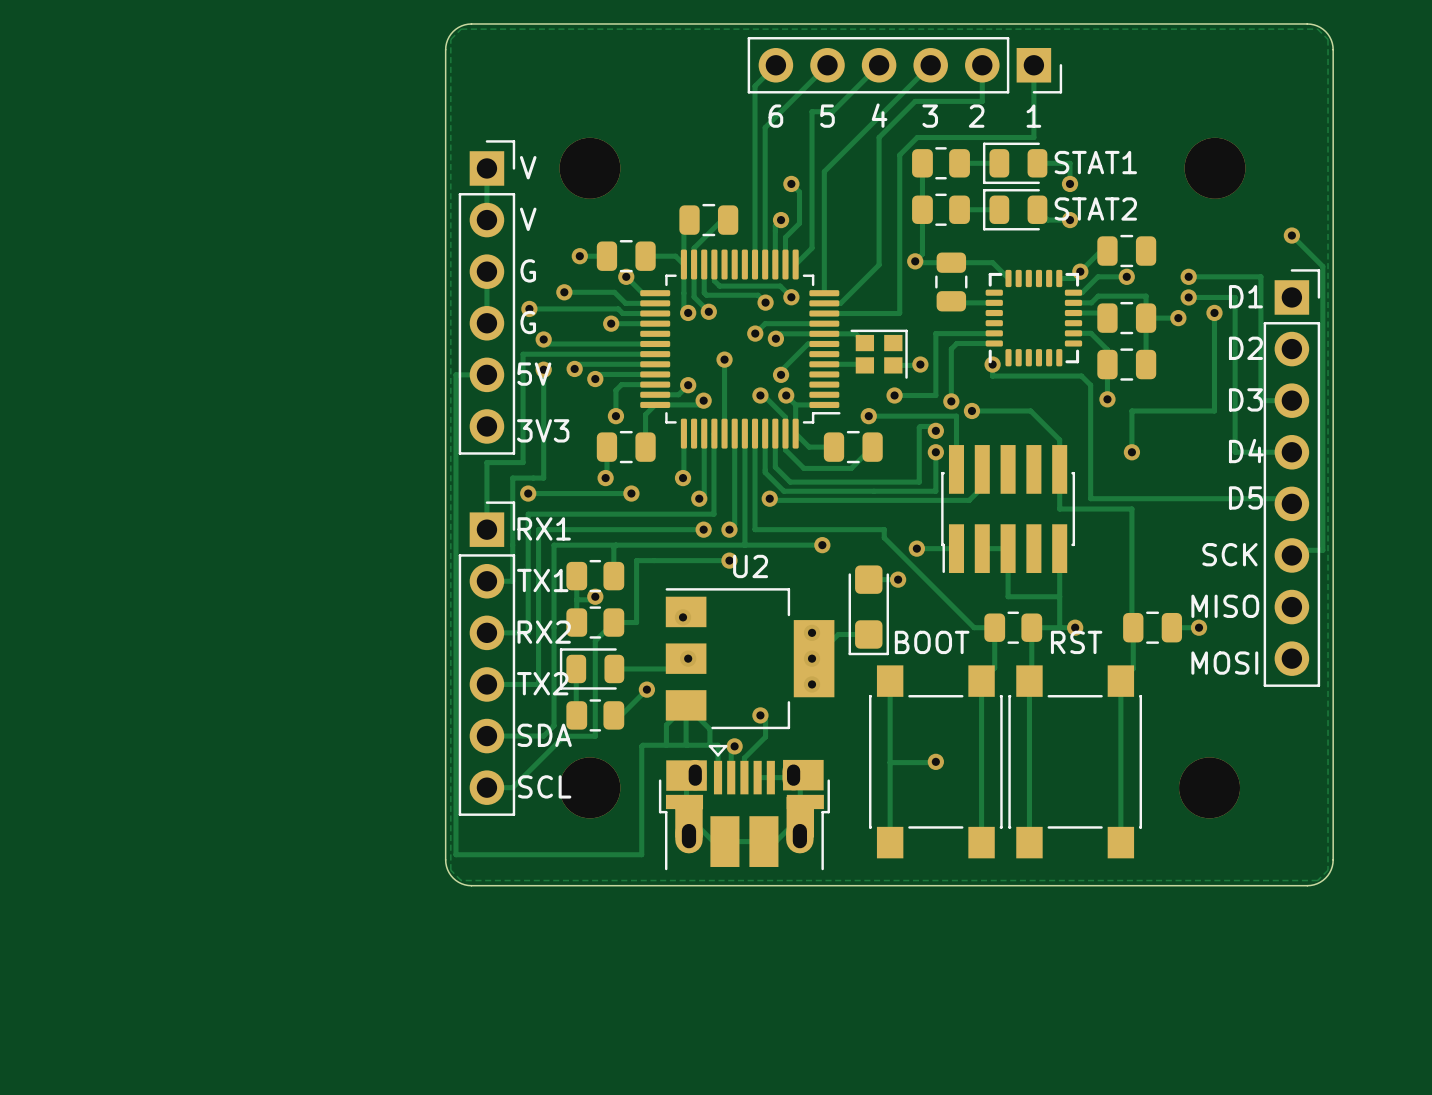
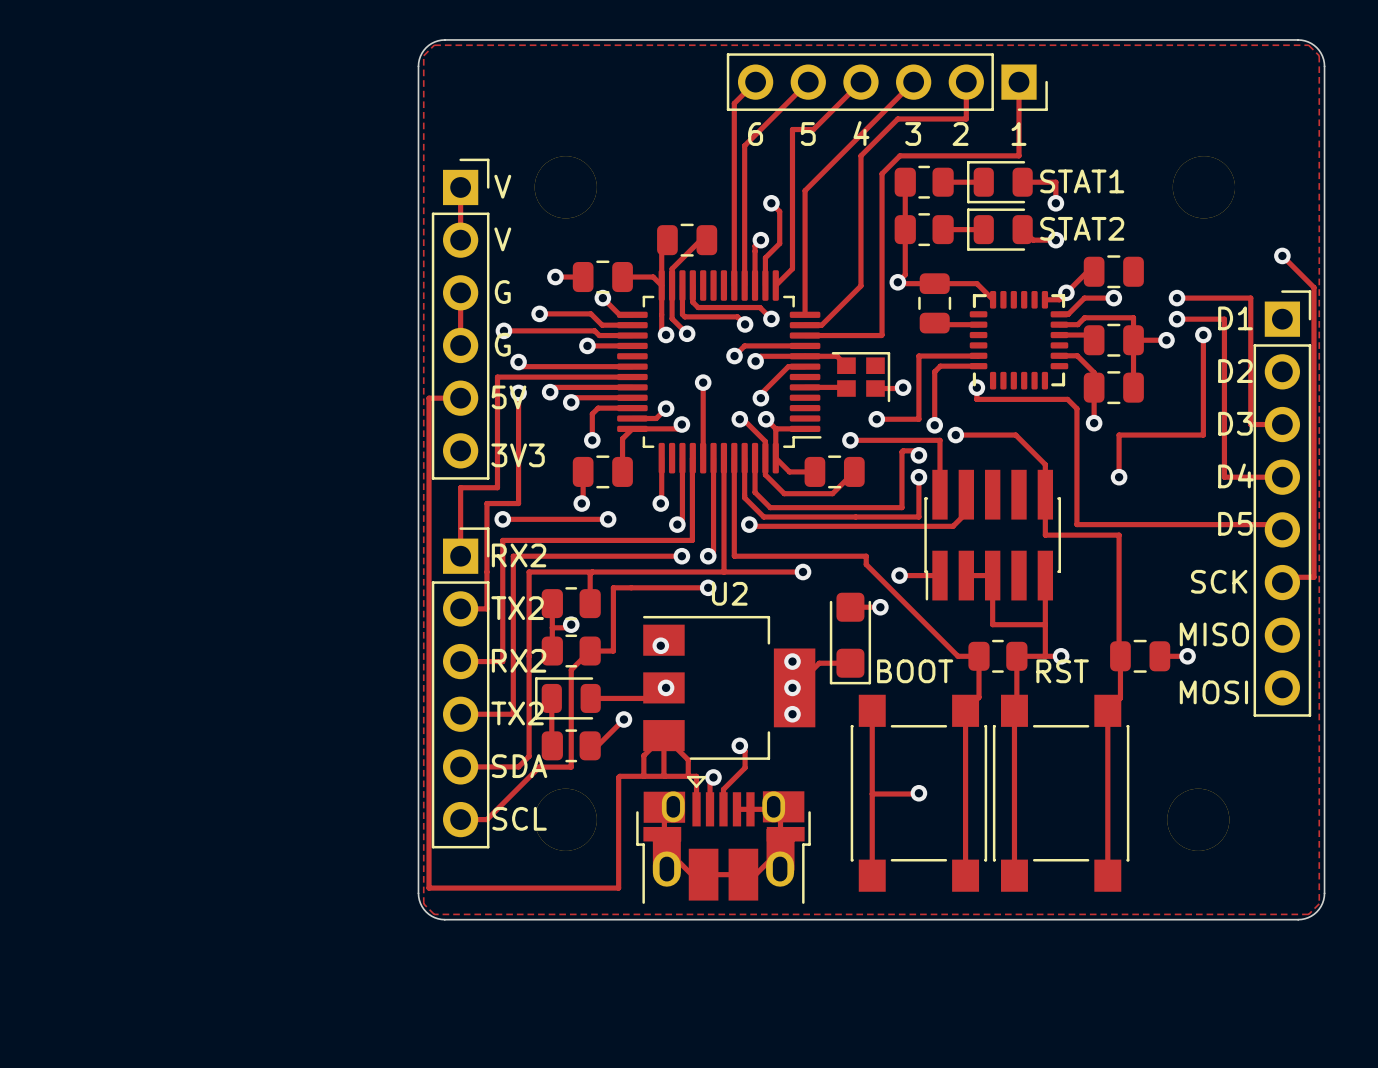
text: RX1 (544, 528) -> RX2 (519, 555)
text: TX1 (542, 580) -> TX2 (517, 608)

